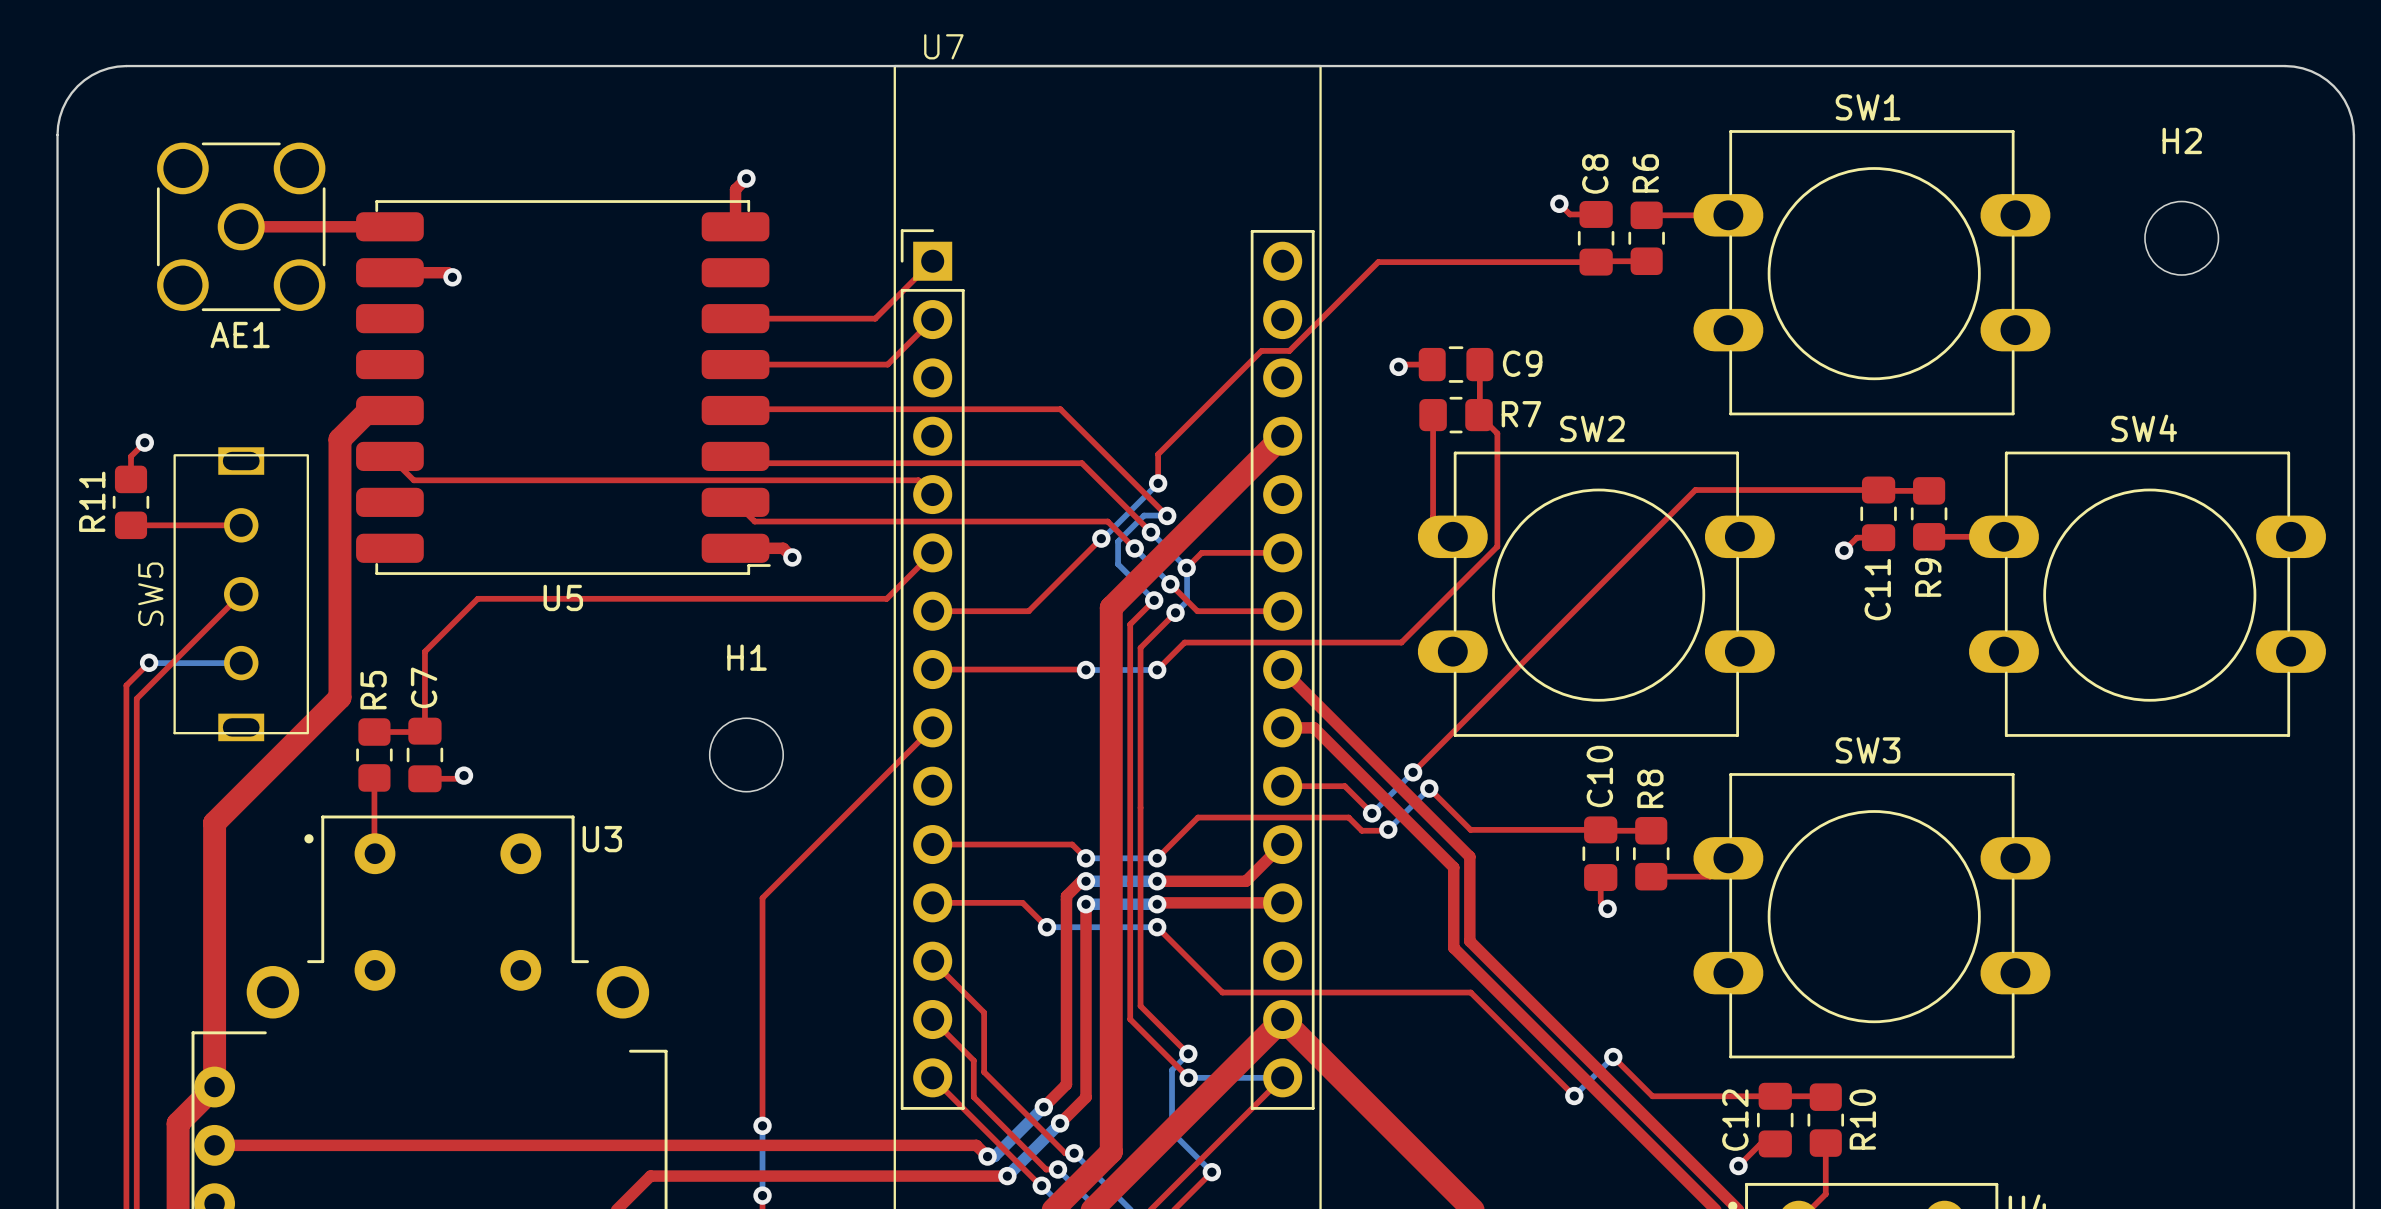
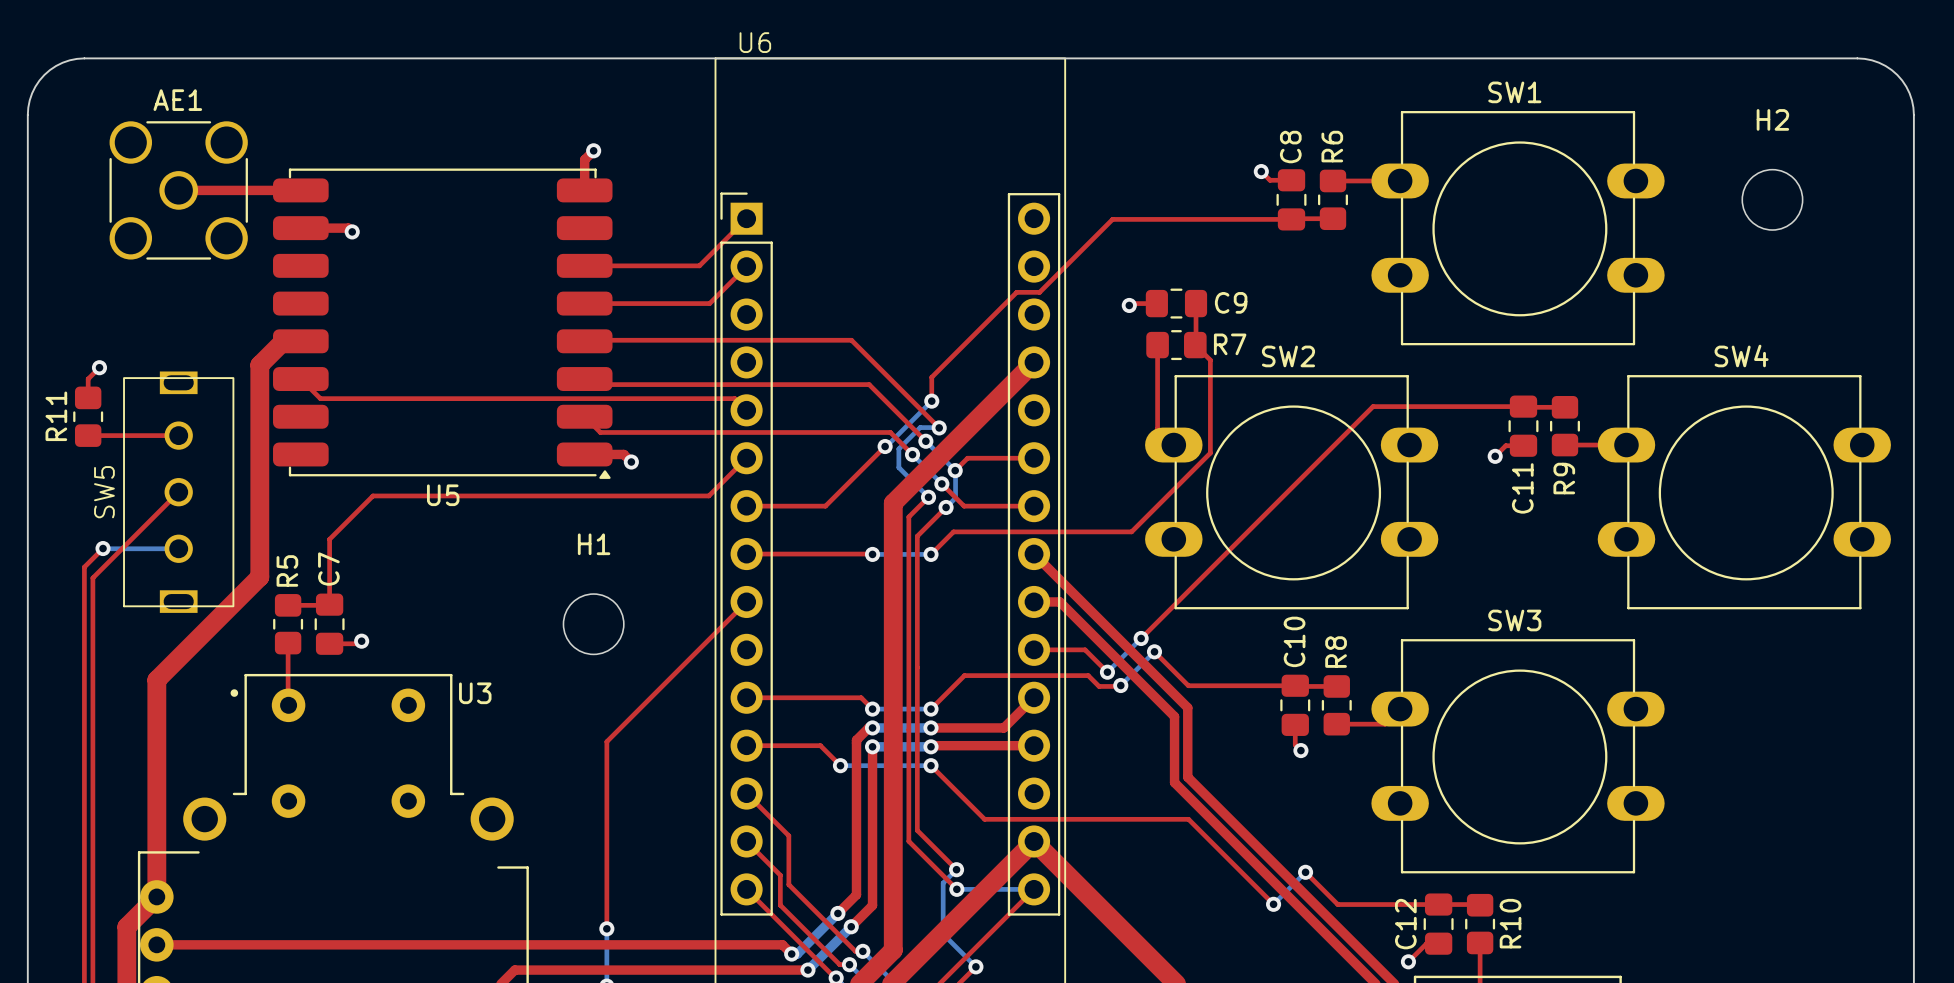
U7 name: U7 (943, 46) -> U6 (755, 42)
U5 footprint: [356, 200, 771, 575] -> [273, 168, 613, 479]
AE1 name position: AE1 (240, 335) -> AE1 (177, 100)

